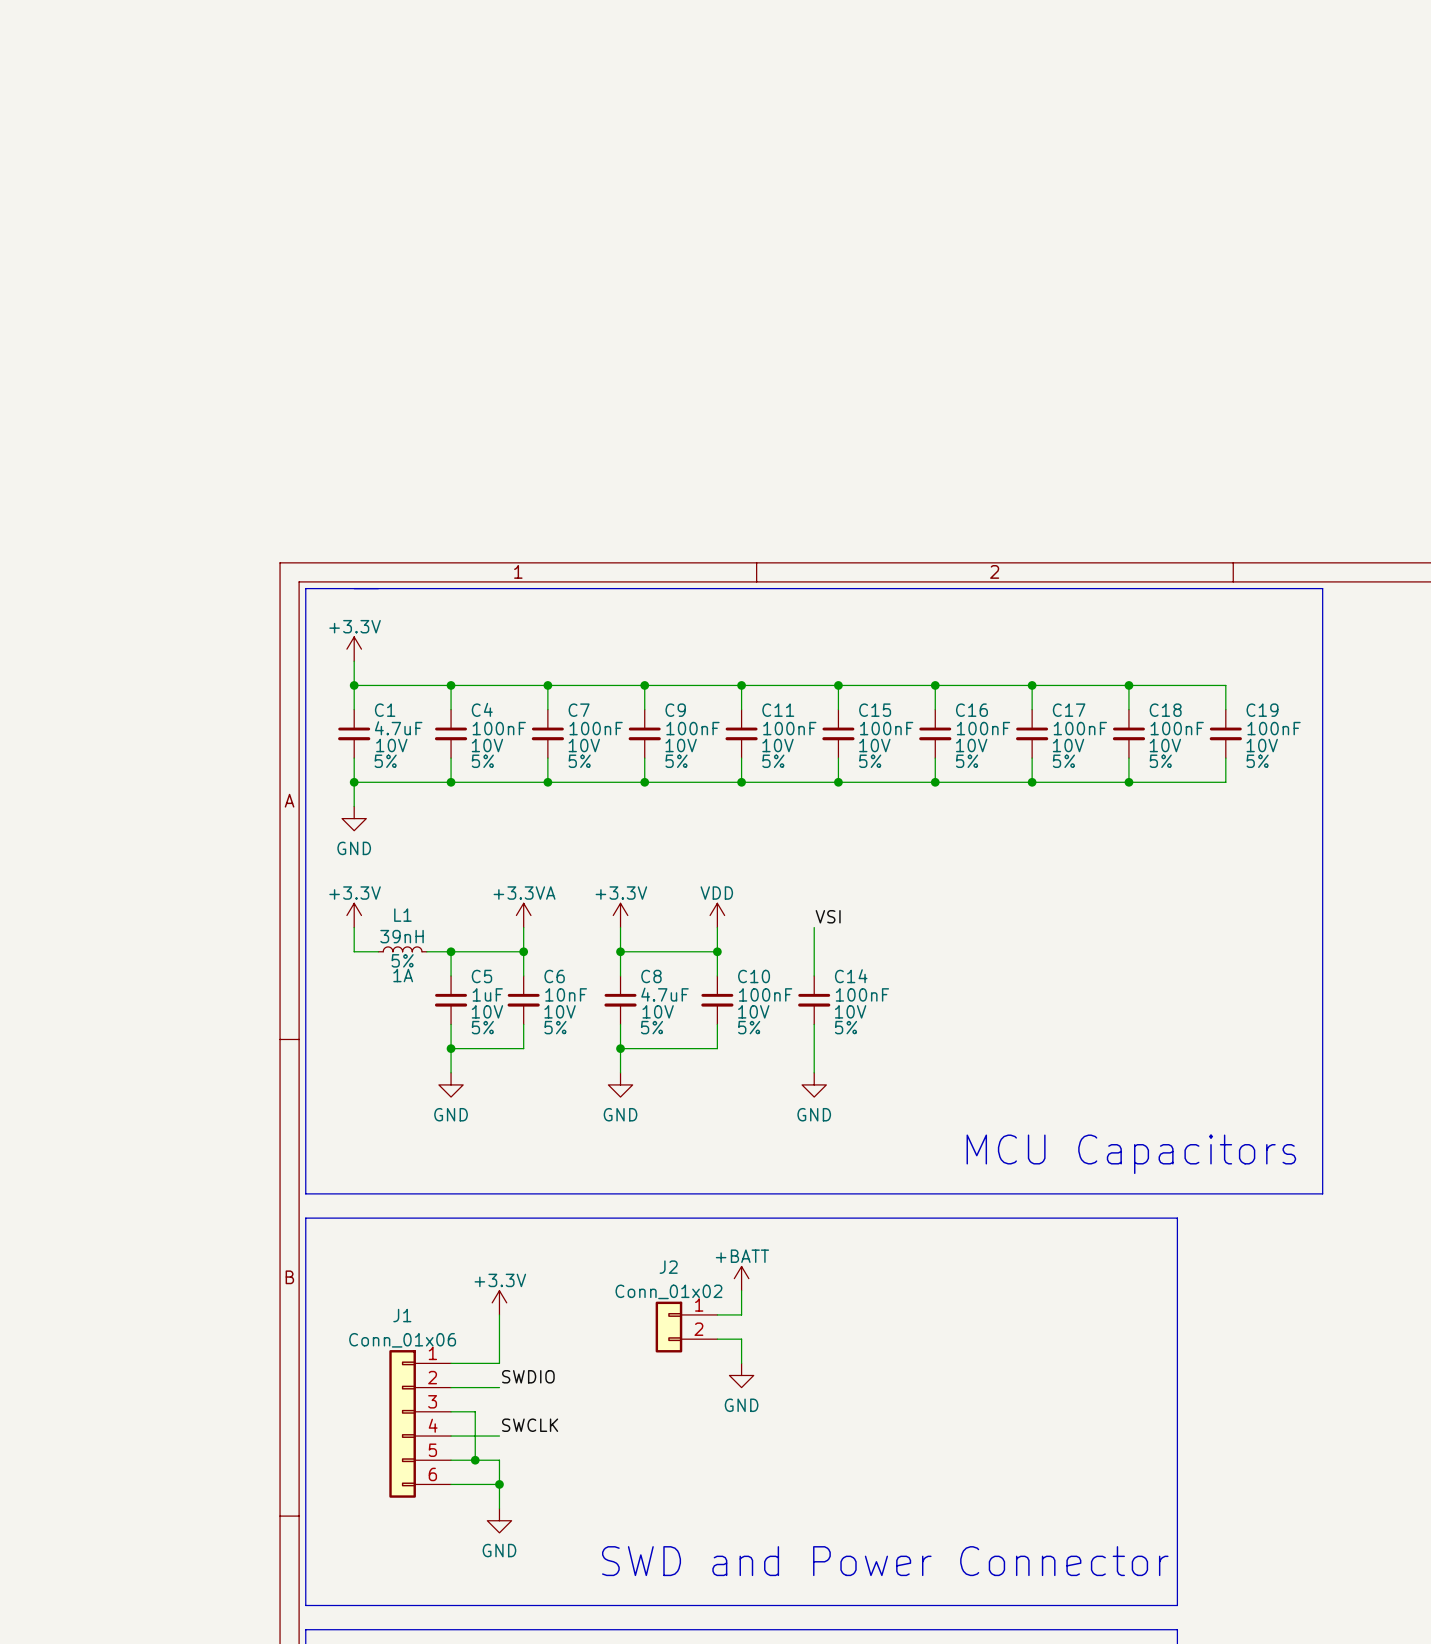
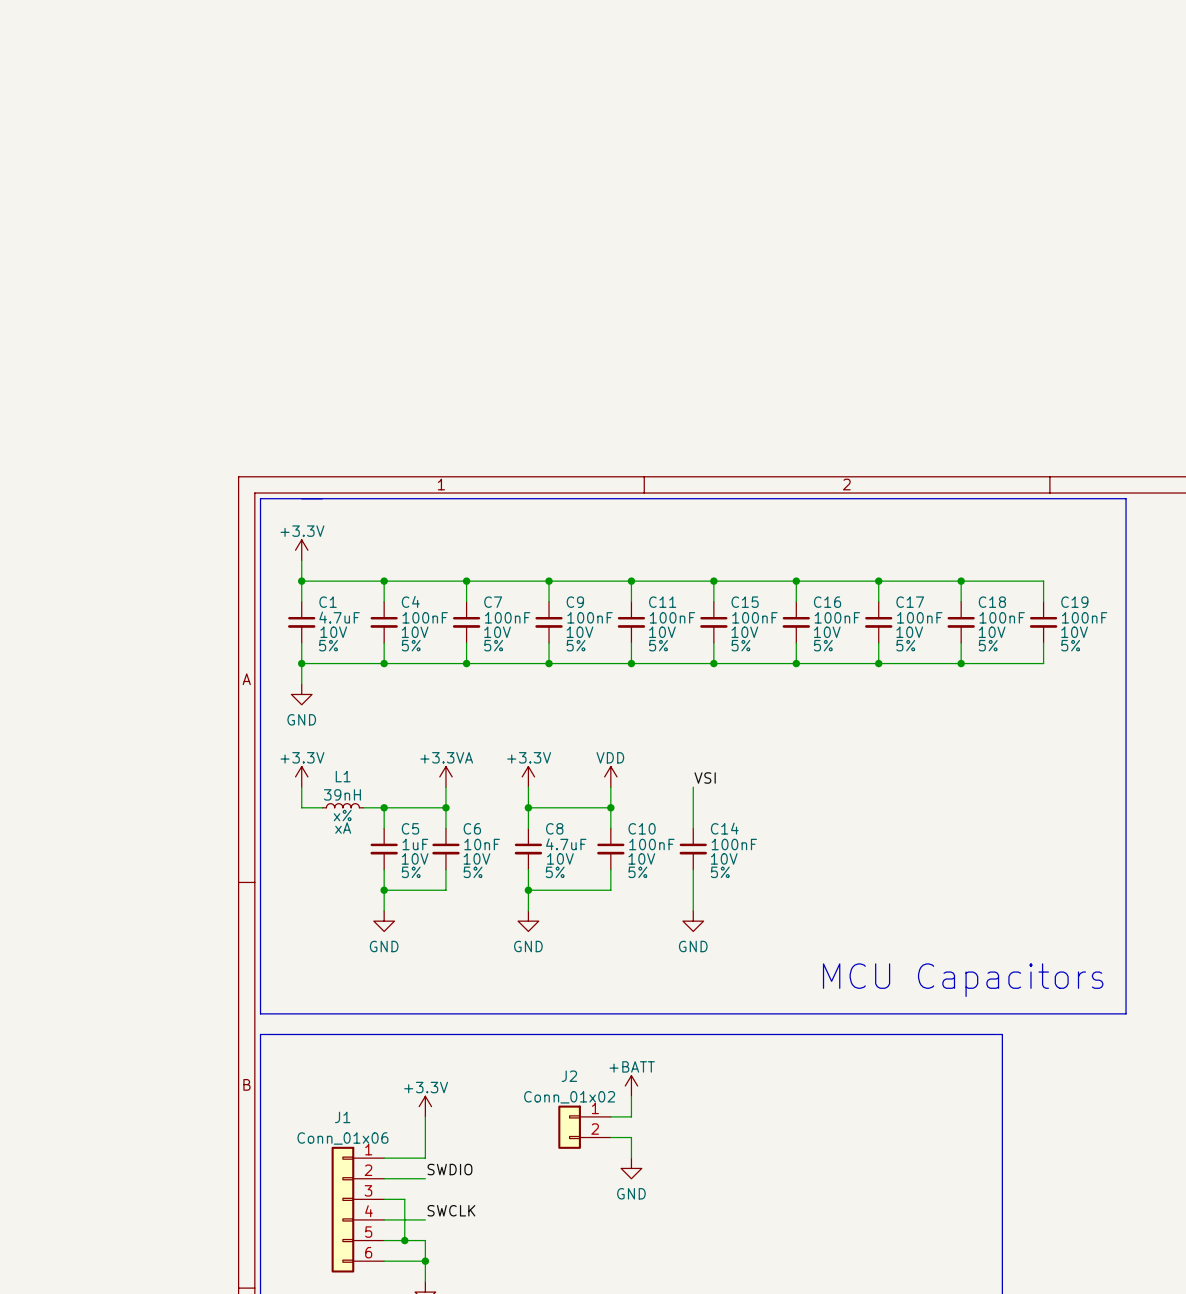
L1 text: 5% (402, 960) -> x% (342, 815)
L1 text: 1A (403, 975) -> xA (343, 828)

